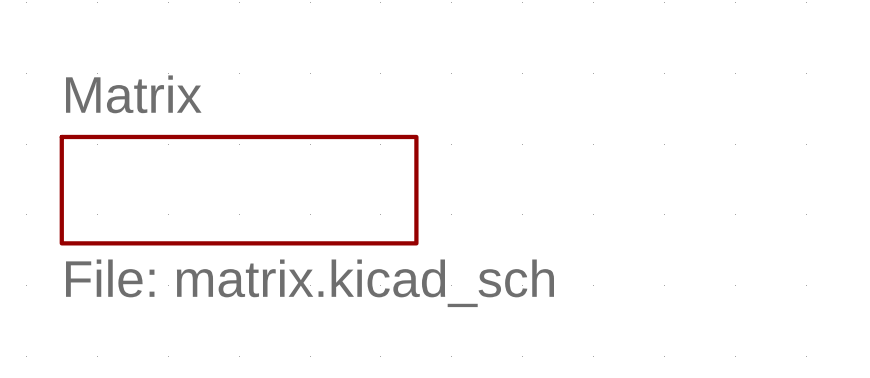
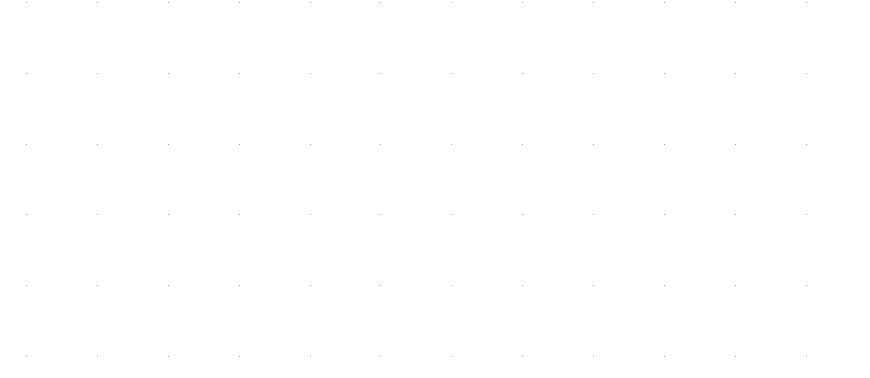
sheet Matrix: File: matrix.kicad_sch (239, 190) -> none

